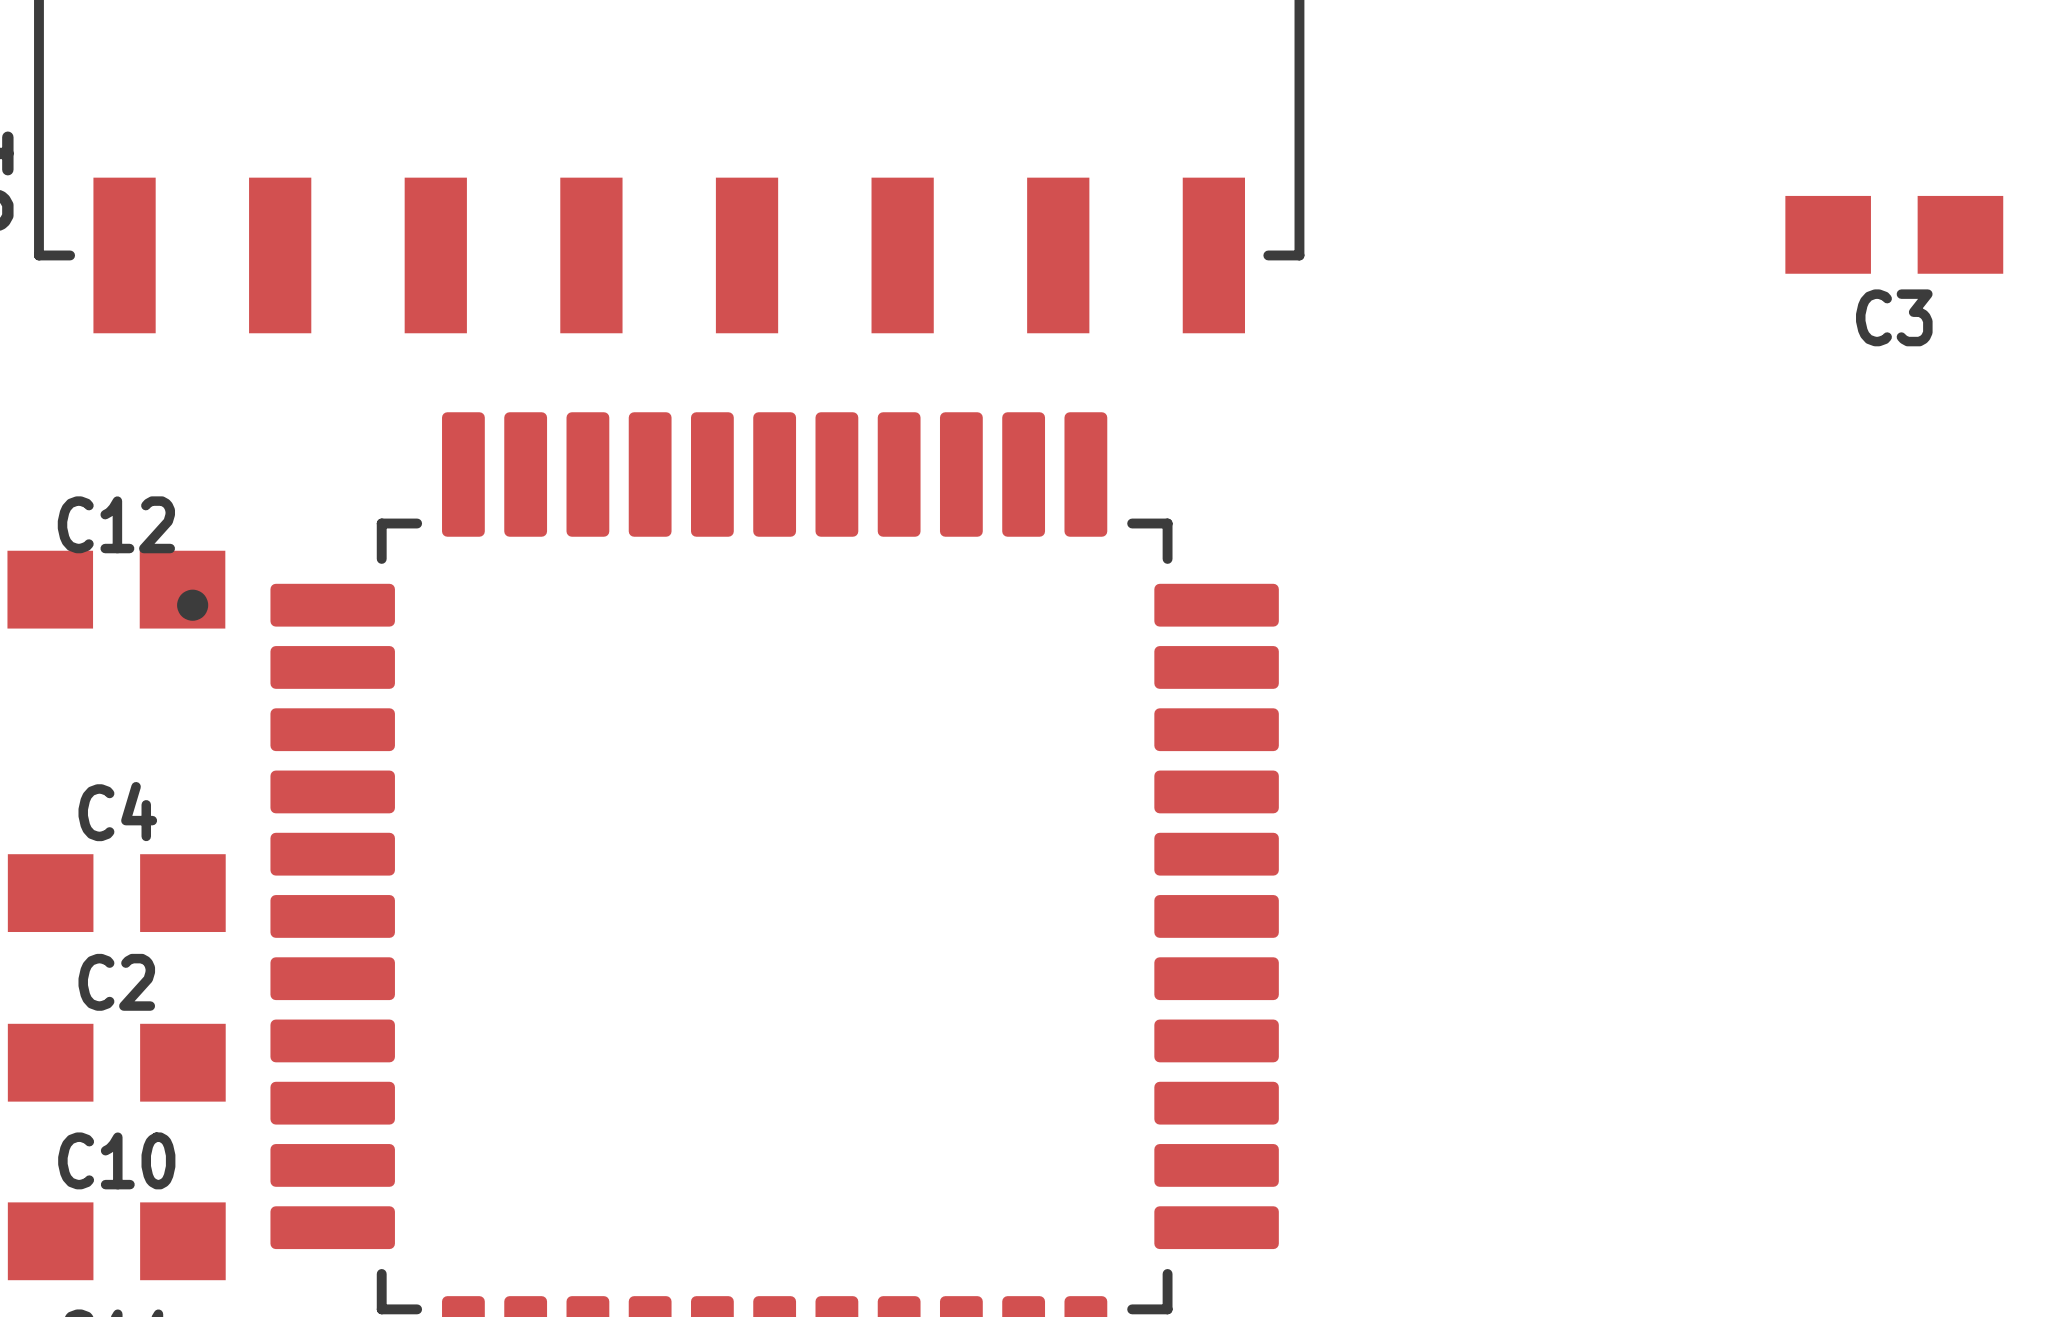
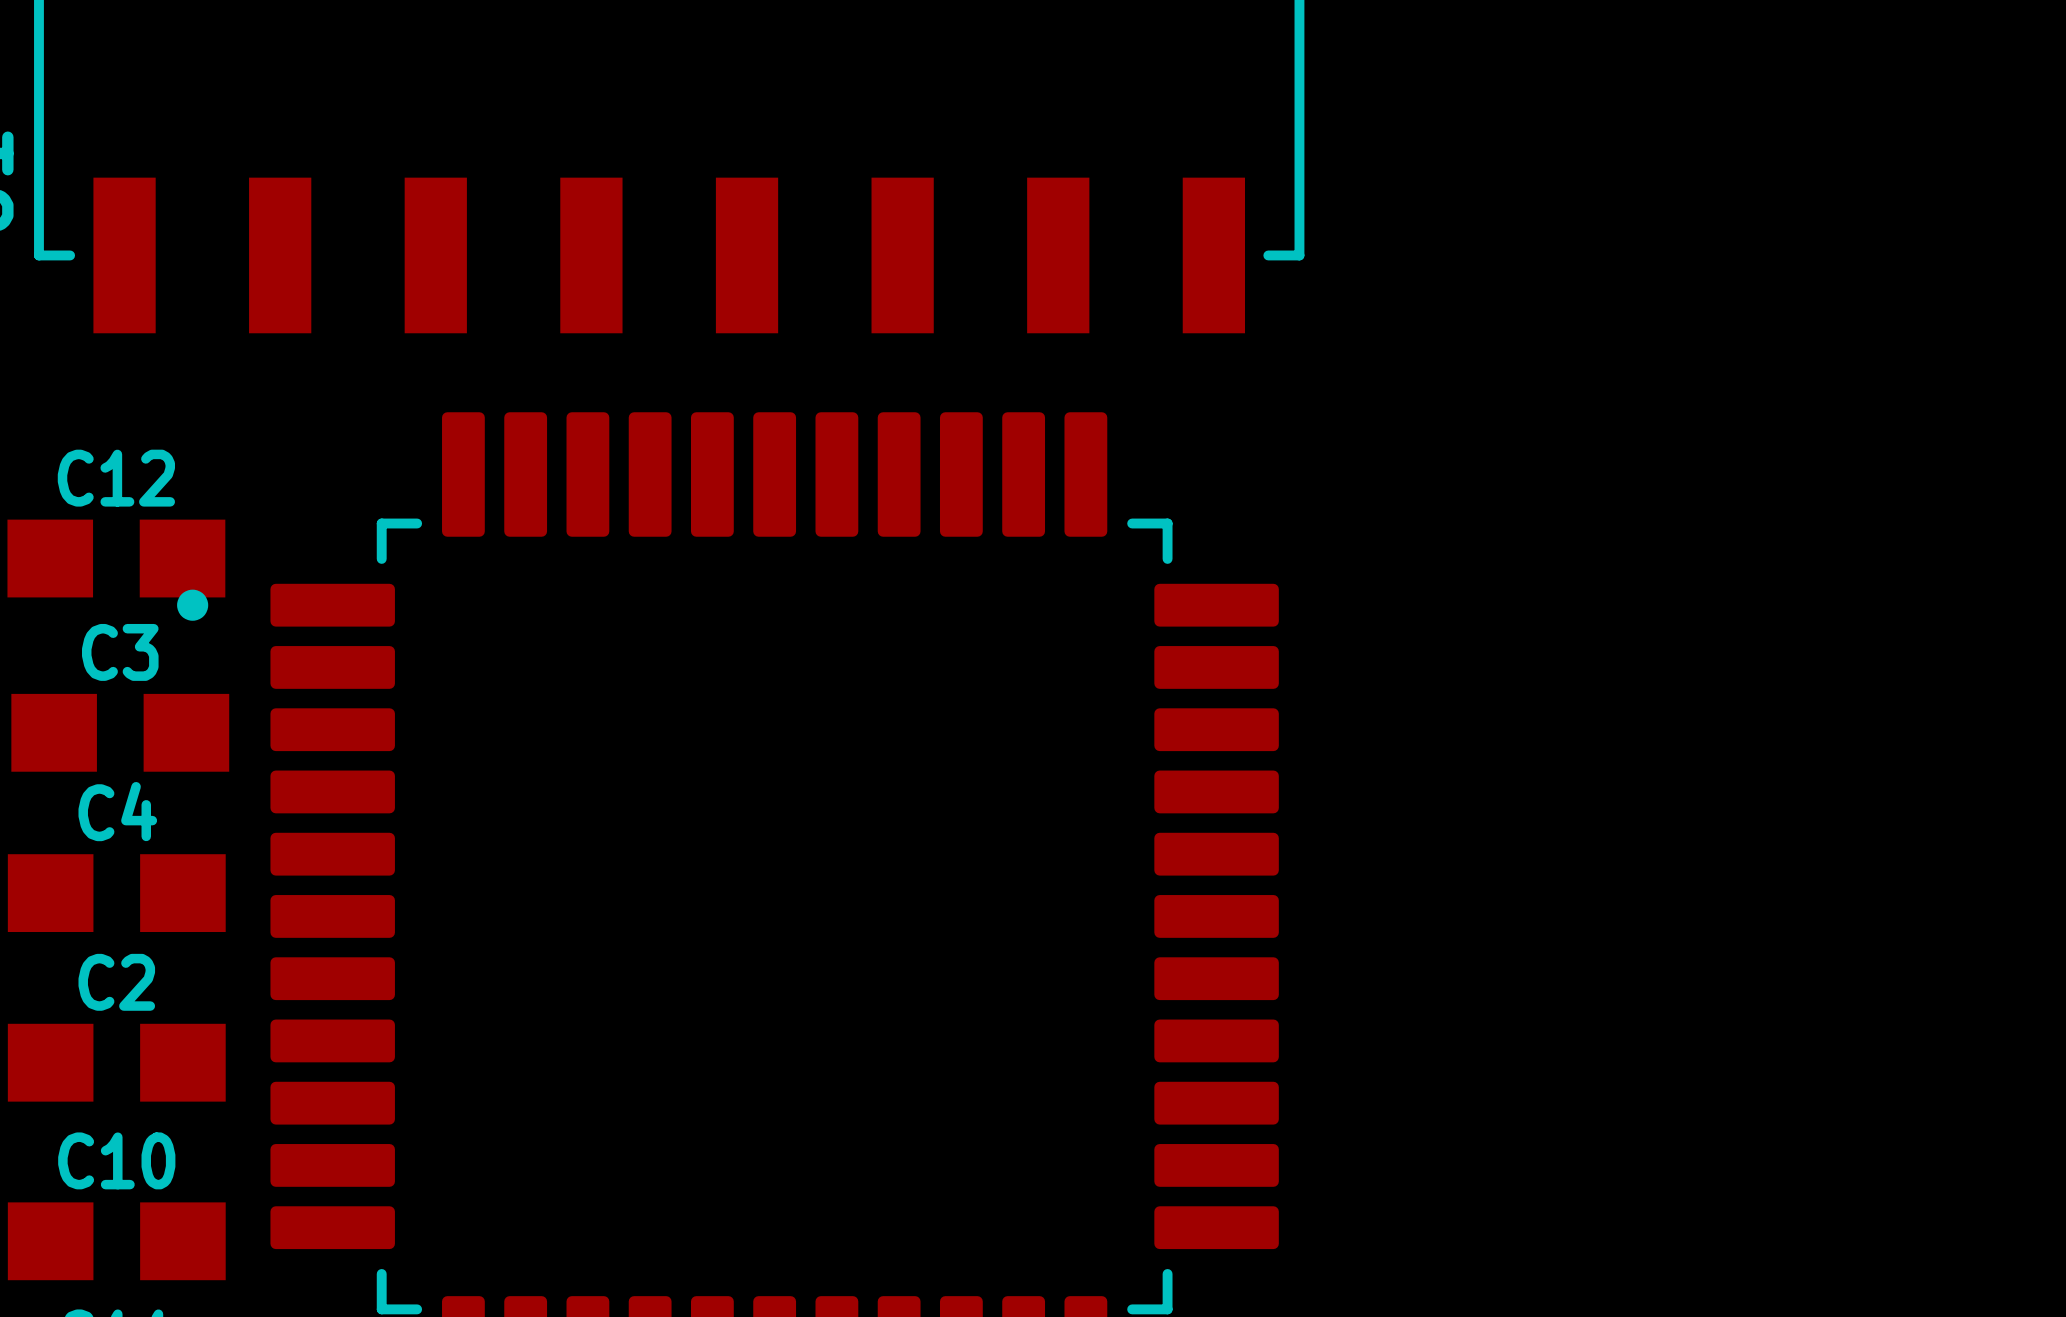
C3 position: (1894, 234) -> (120, 732)
C3 name position: C3 (1894, 317) -> C3 (120, 652)
C12 name position: C12 (116, 524) -> C12 (116, 478)
C12 position: (116, 589) -> (116, 558)

